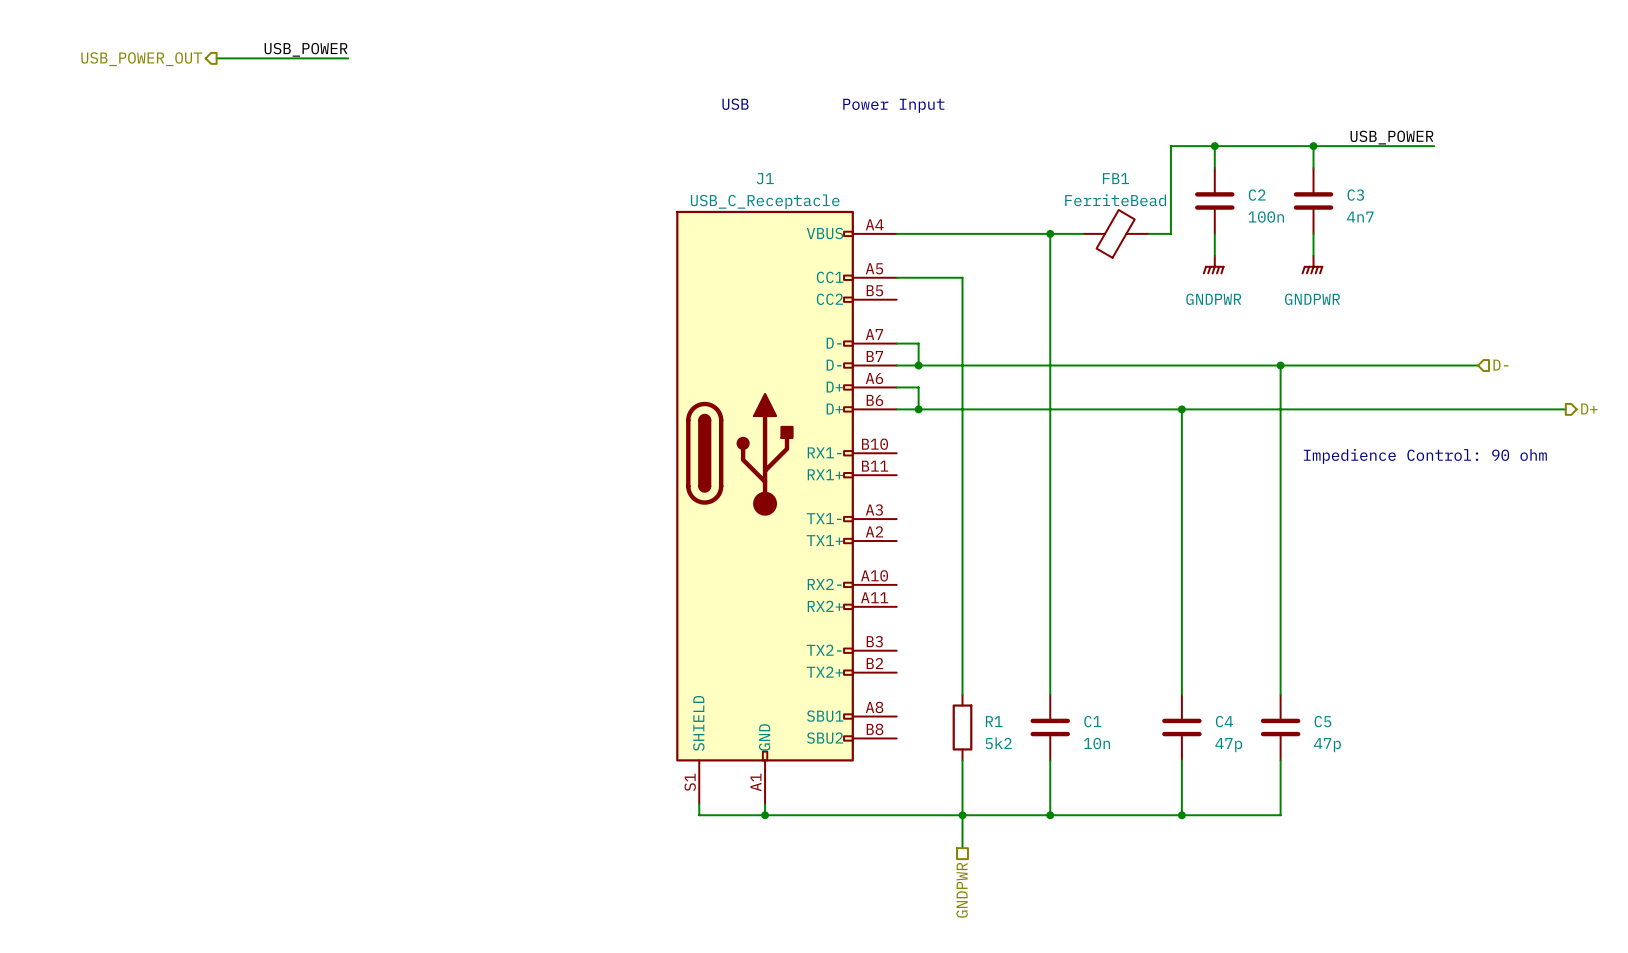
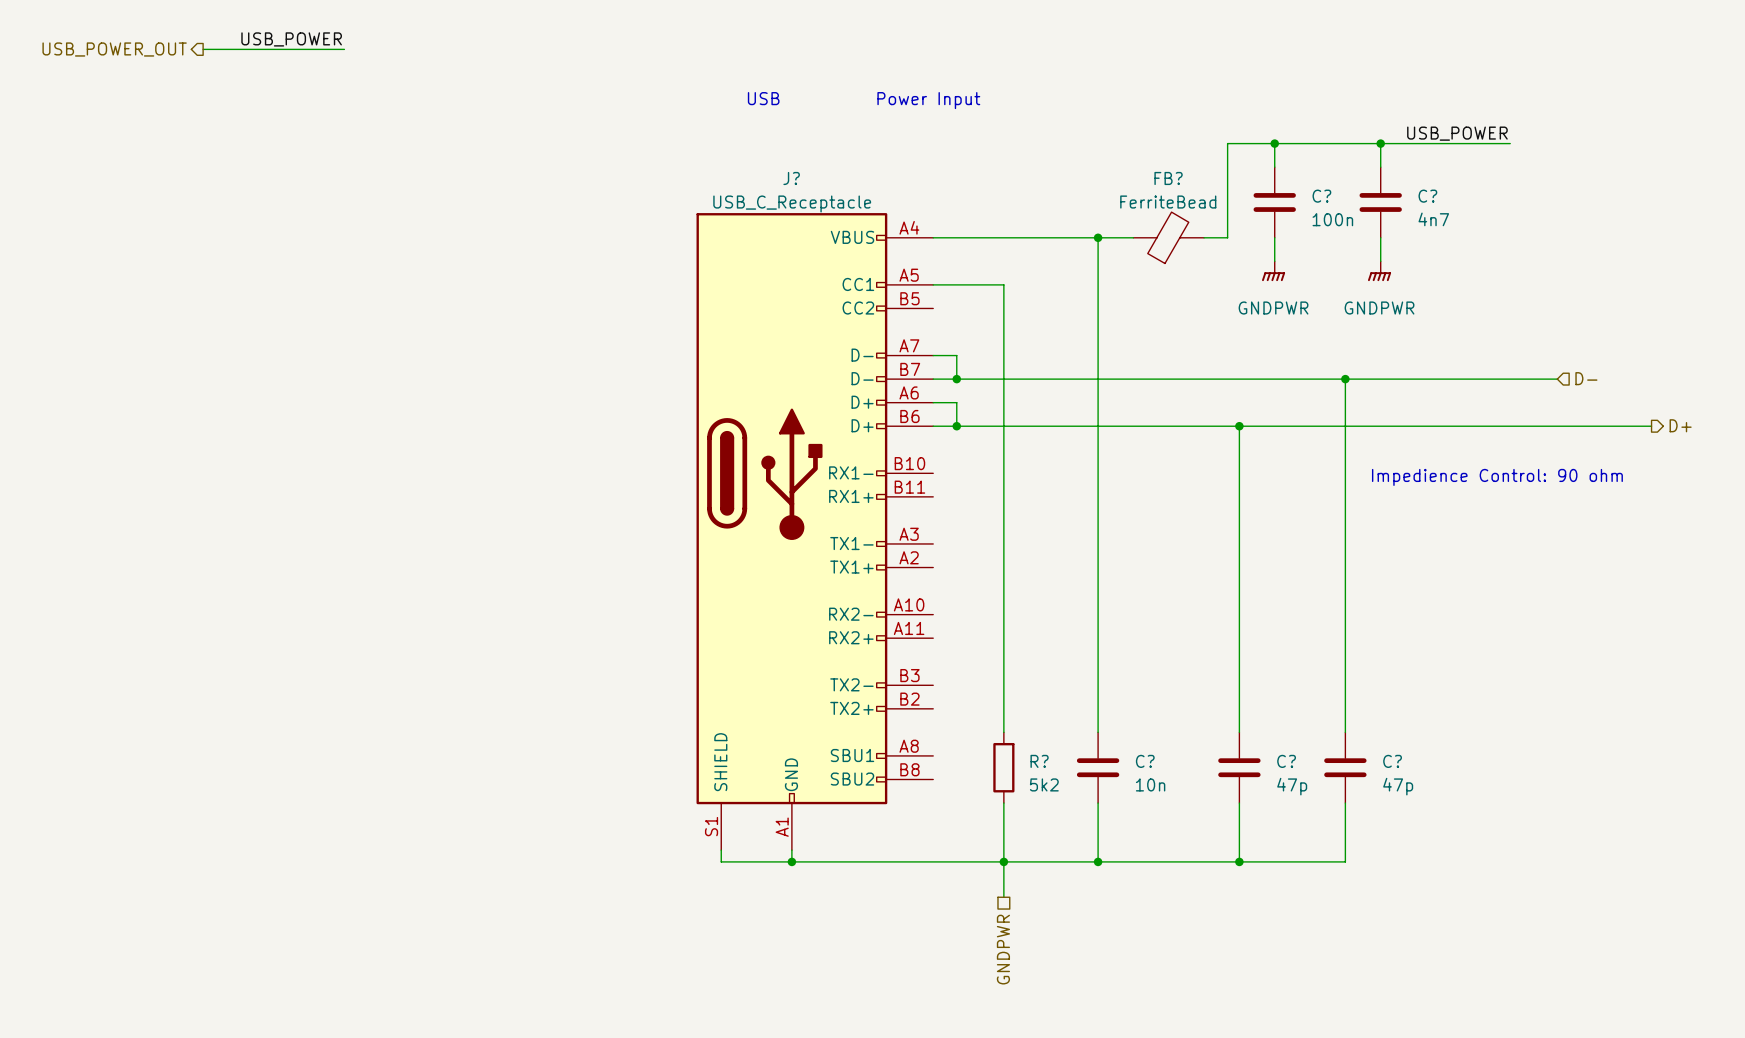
J1 name: J1 (765, 178) -> J? (791, 178)
FB1 name: FB1 (1115, 178) -> FB? (1168, 178)
C2 name: C2 (1257, 195) -> C? (1321, 196)
C3 name: C3 (1355, 195) -> C? (1427, 196)
R1 name: R1 (994, 721) -> R? (1039, 761)
C1 name: C1 (1092, 721) -> C? (1145, 761)
C4 name: C4 (1224, 721) -> C? (1286, 761)
C5 name: C5 (1322, 721) -> C? (1392, 761)

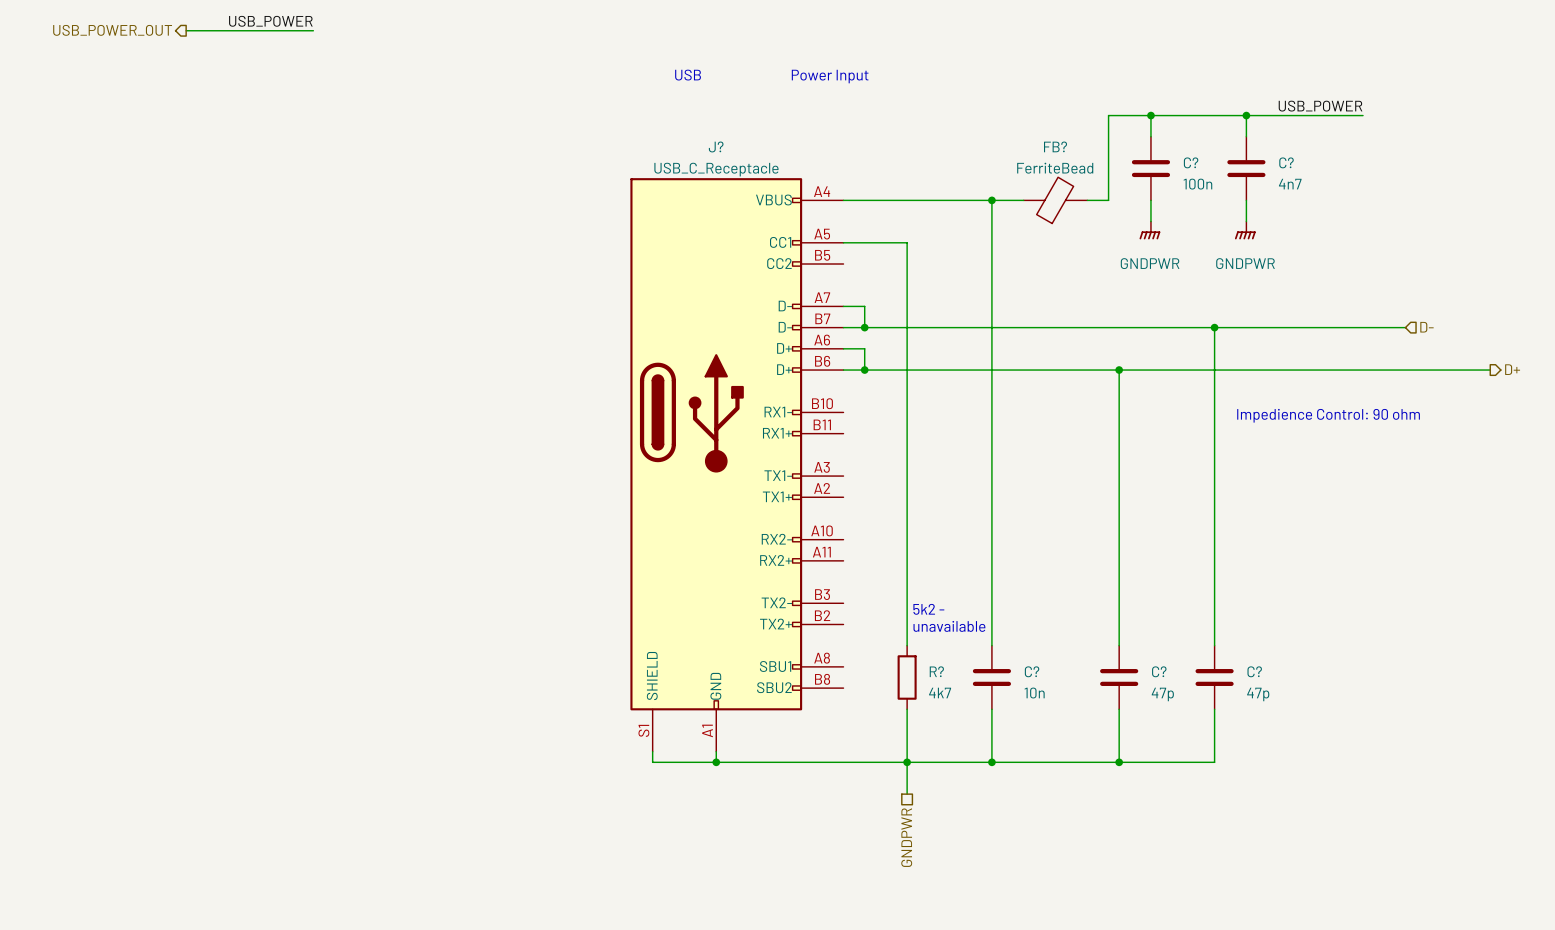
text: none -> 5k2 - (928, 609)
text: none -> unavailable (949, 626)
R? value: 5k2 (1044, 784) -> 4k7 (940, 693)

